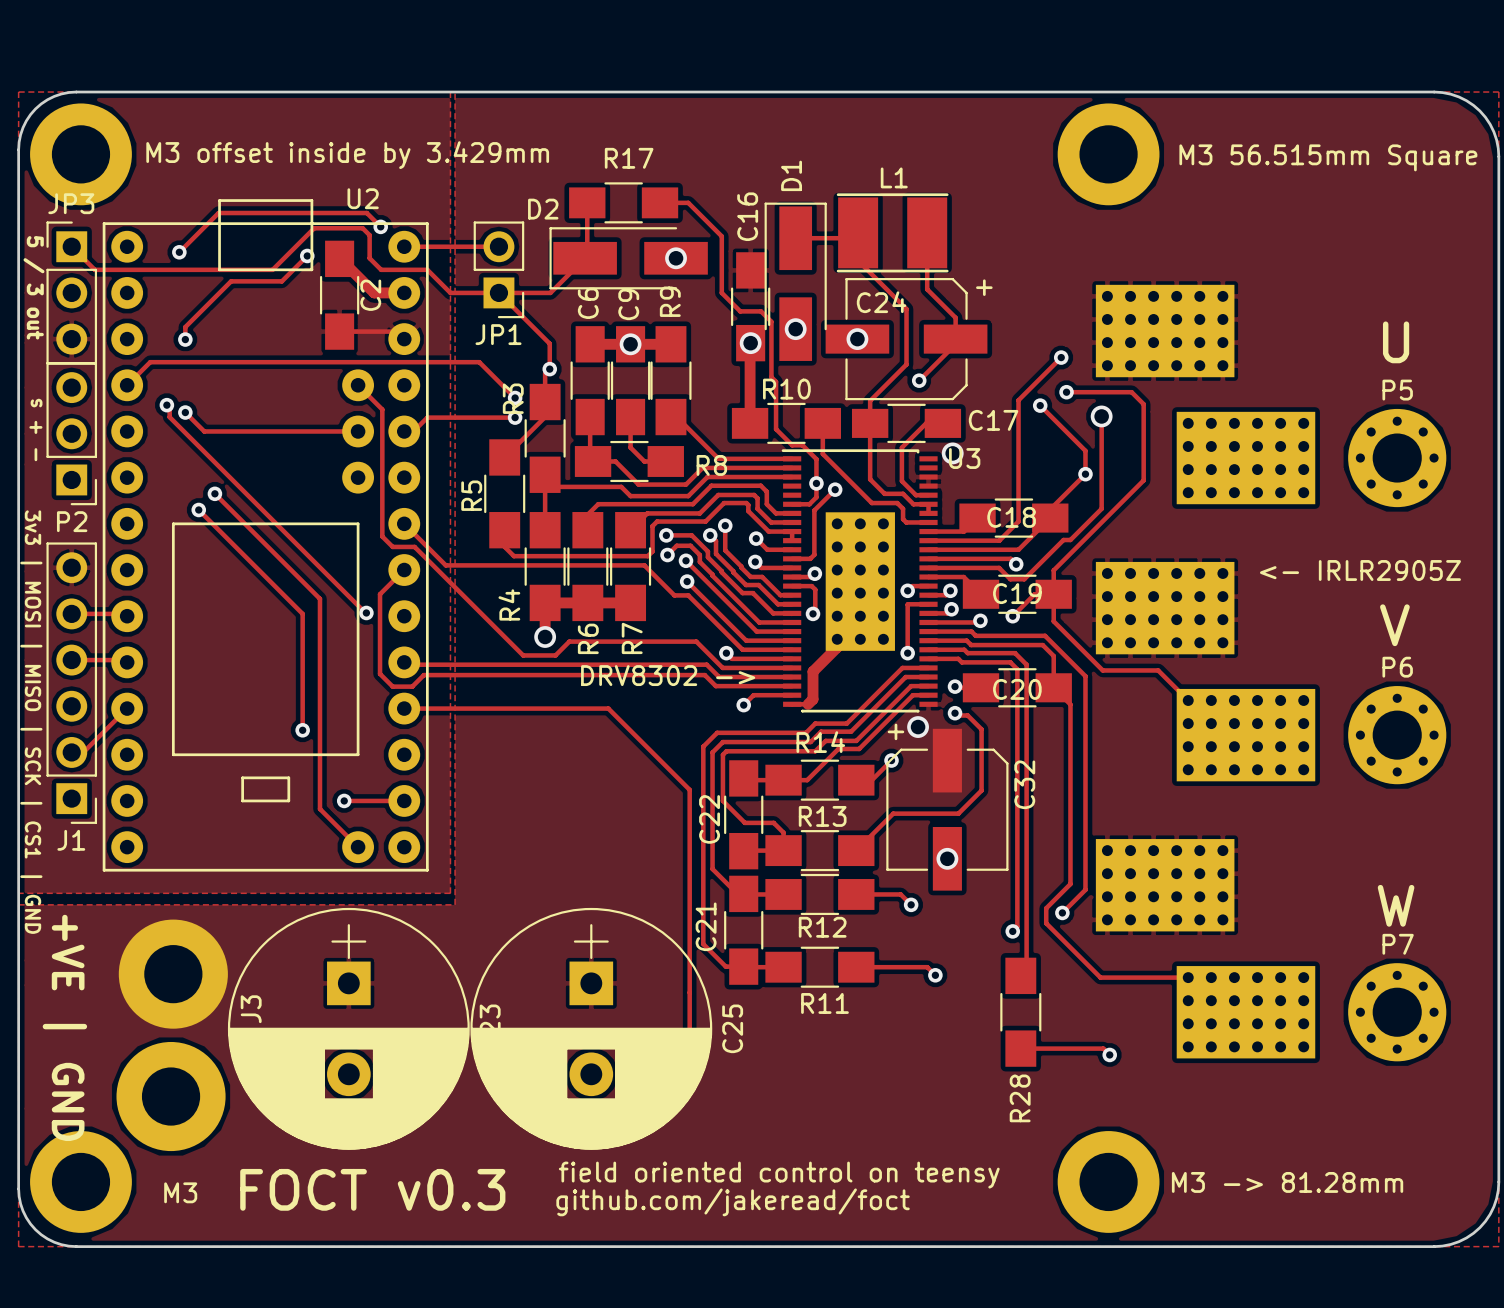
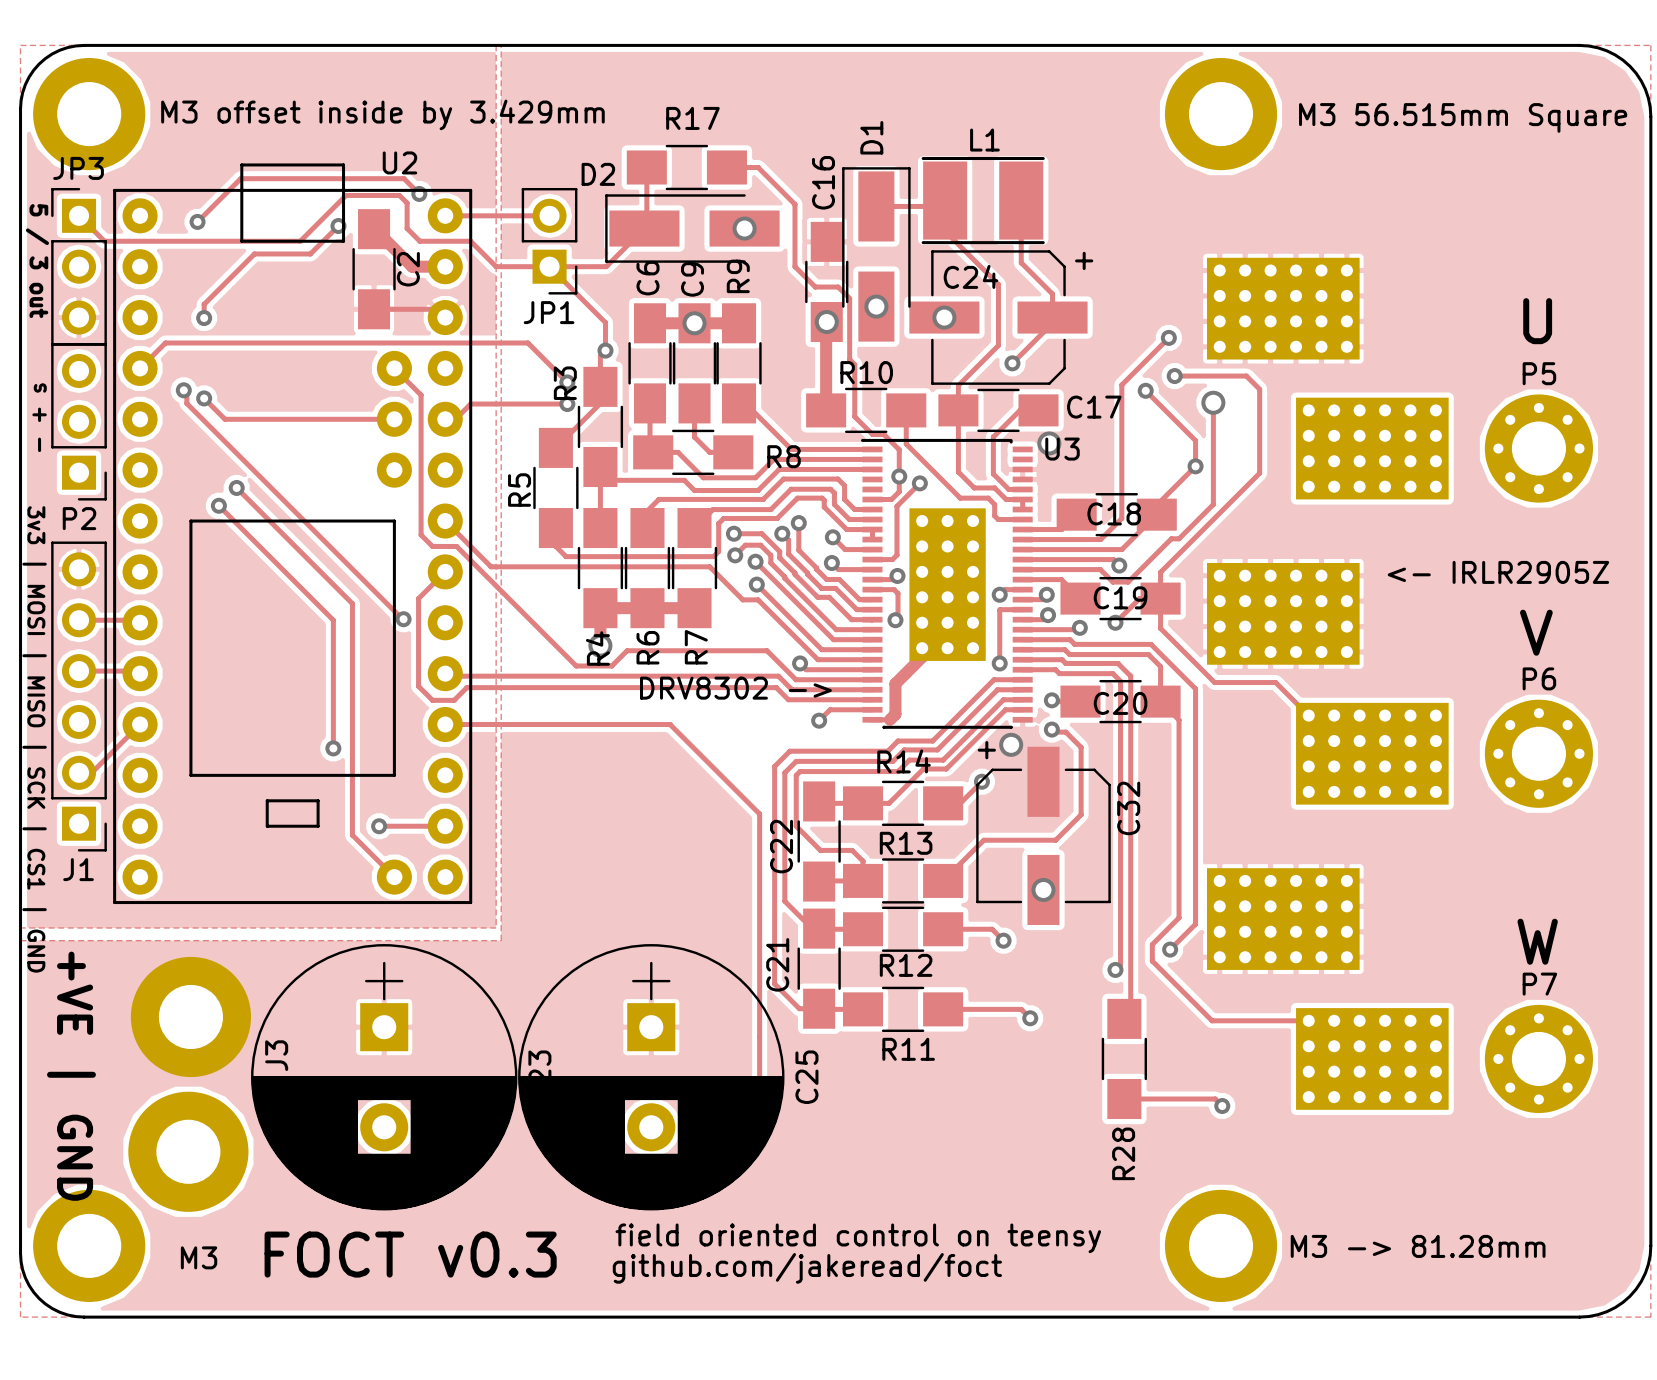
R4 name position: R4 (509, 604) -> R4 (597, 648)

